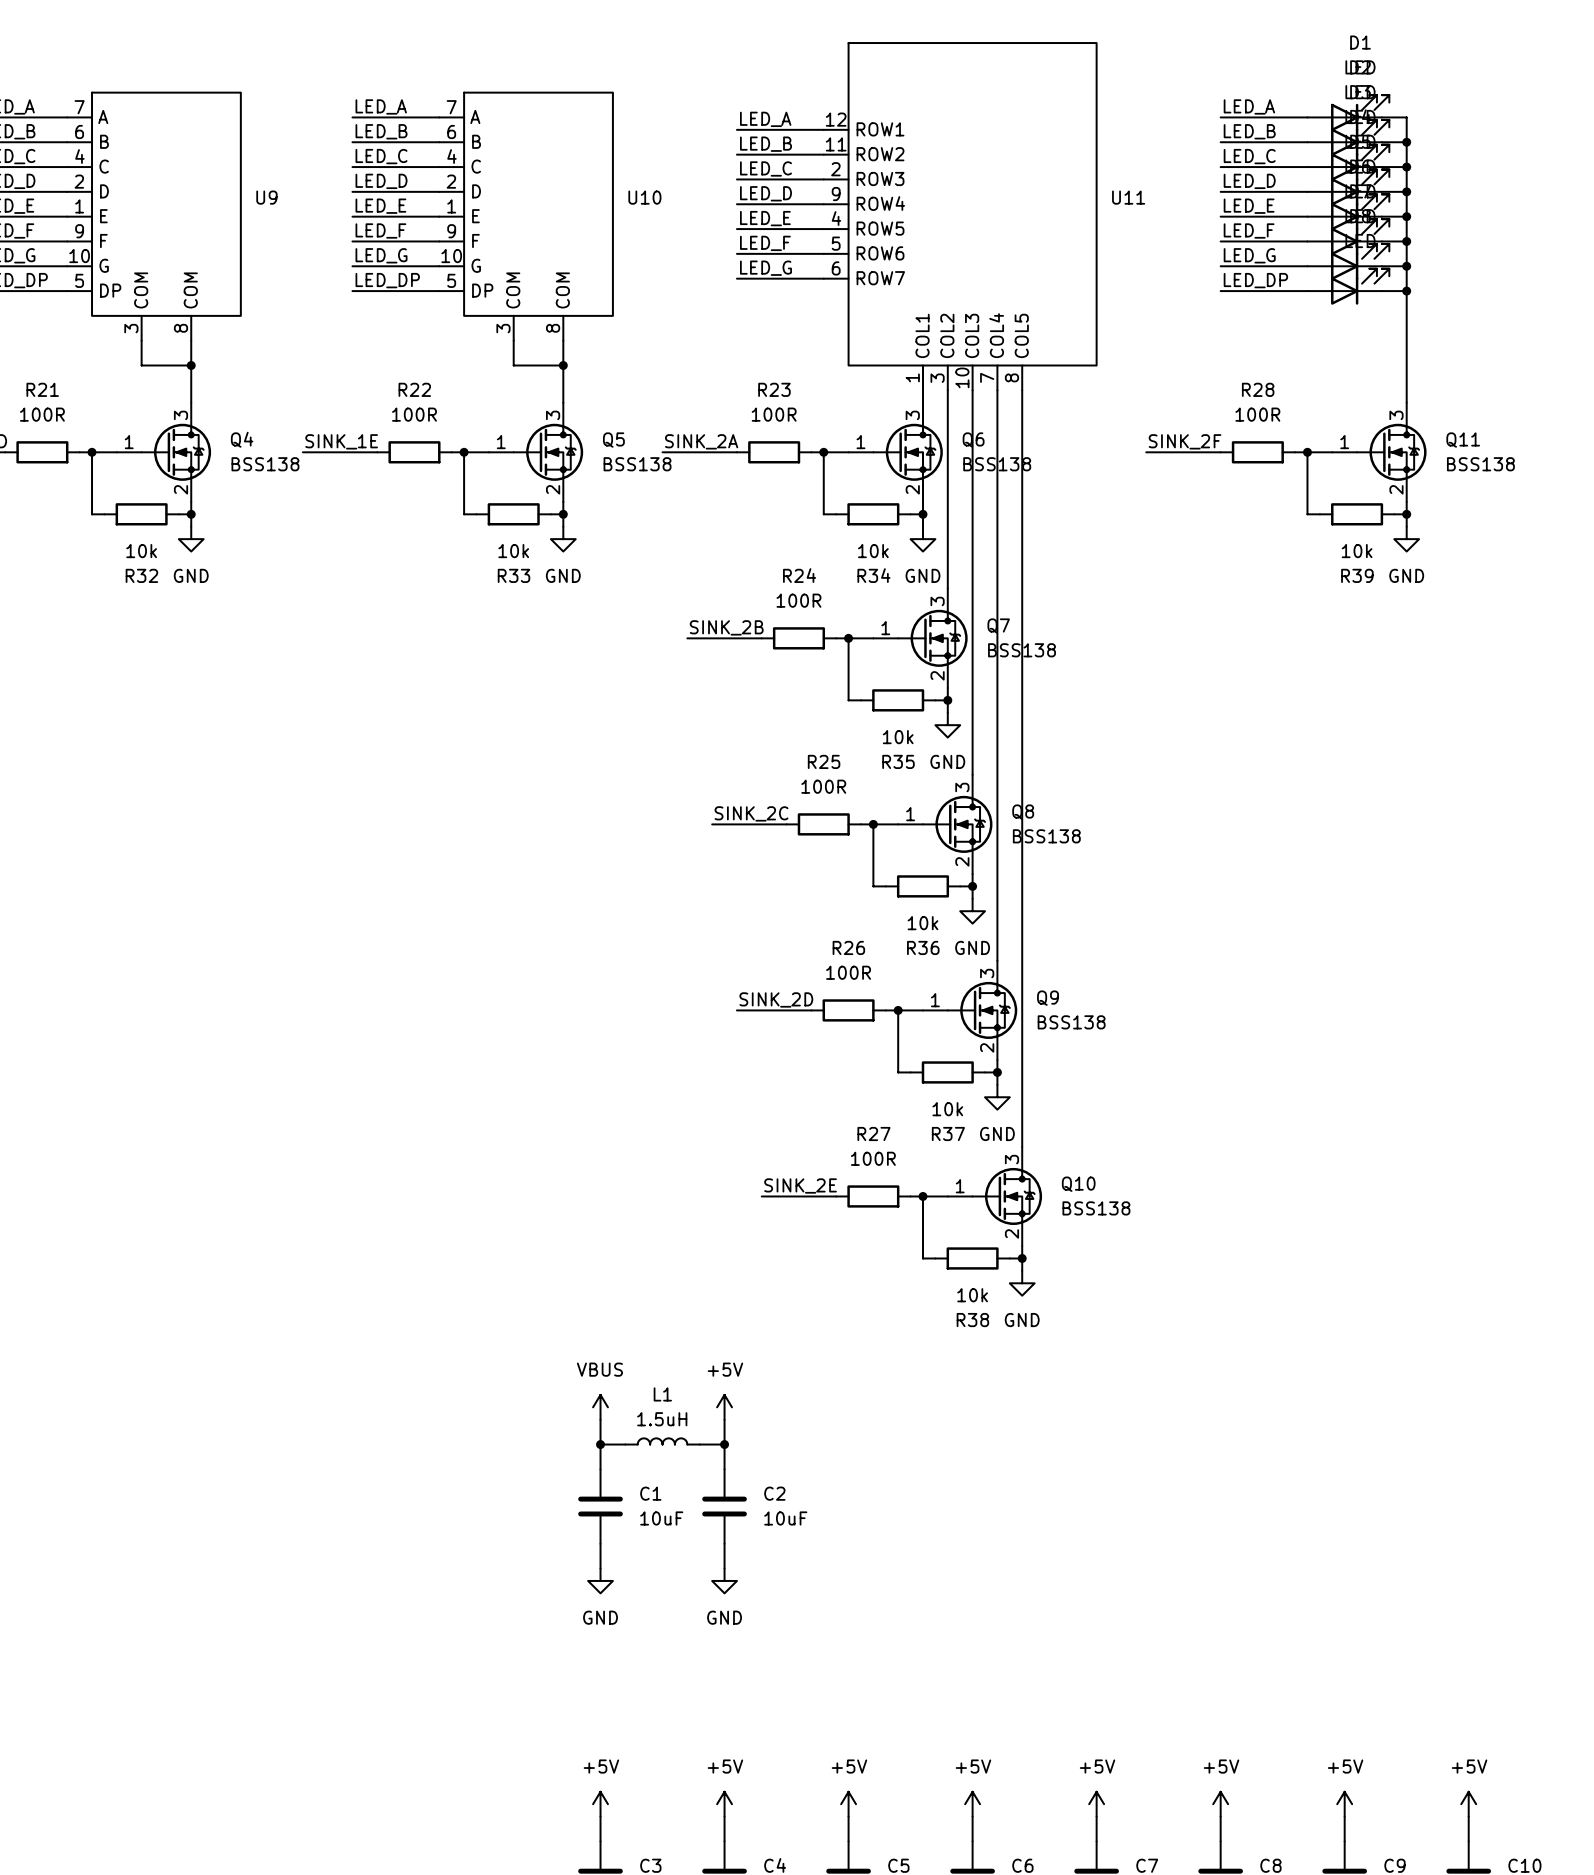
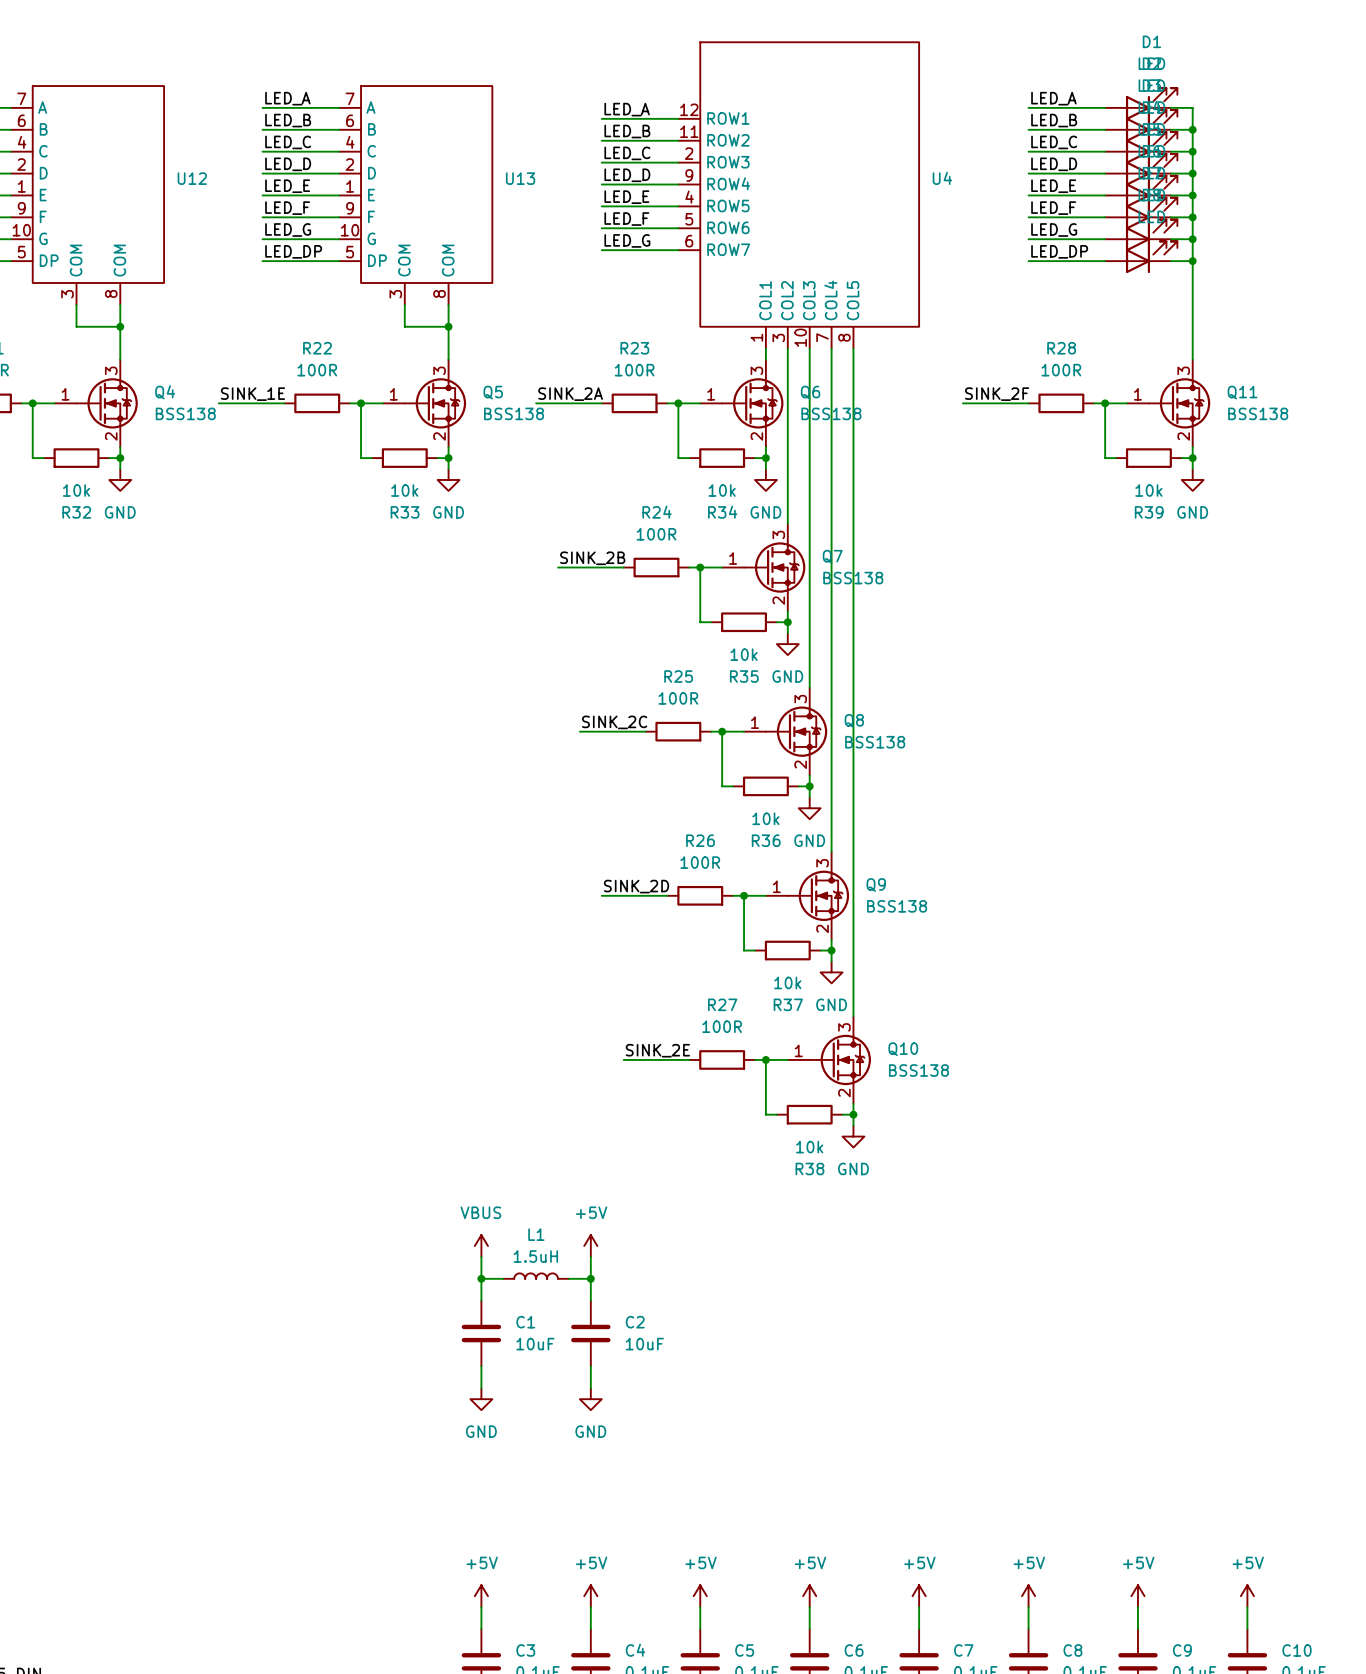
U9 name: U9 (266, 197) -> U12 (192, 178)
U10 name: U10 (644, 197) -> U13 (520, 178)
U11 name: U11 (1128, 197) -> U4 (942, 178)

